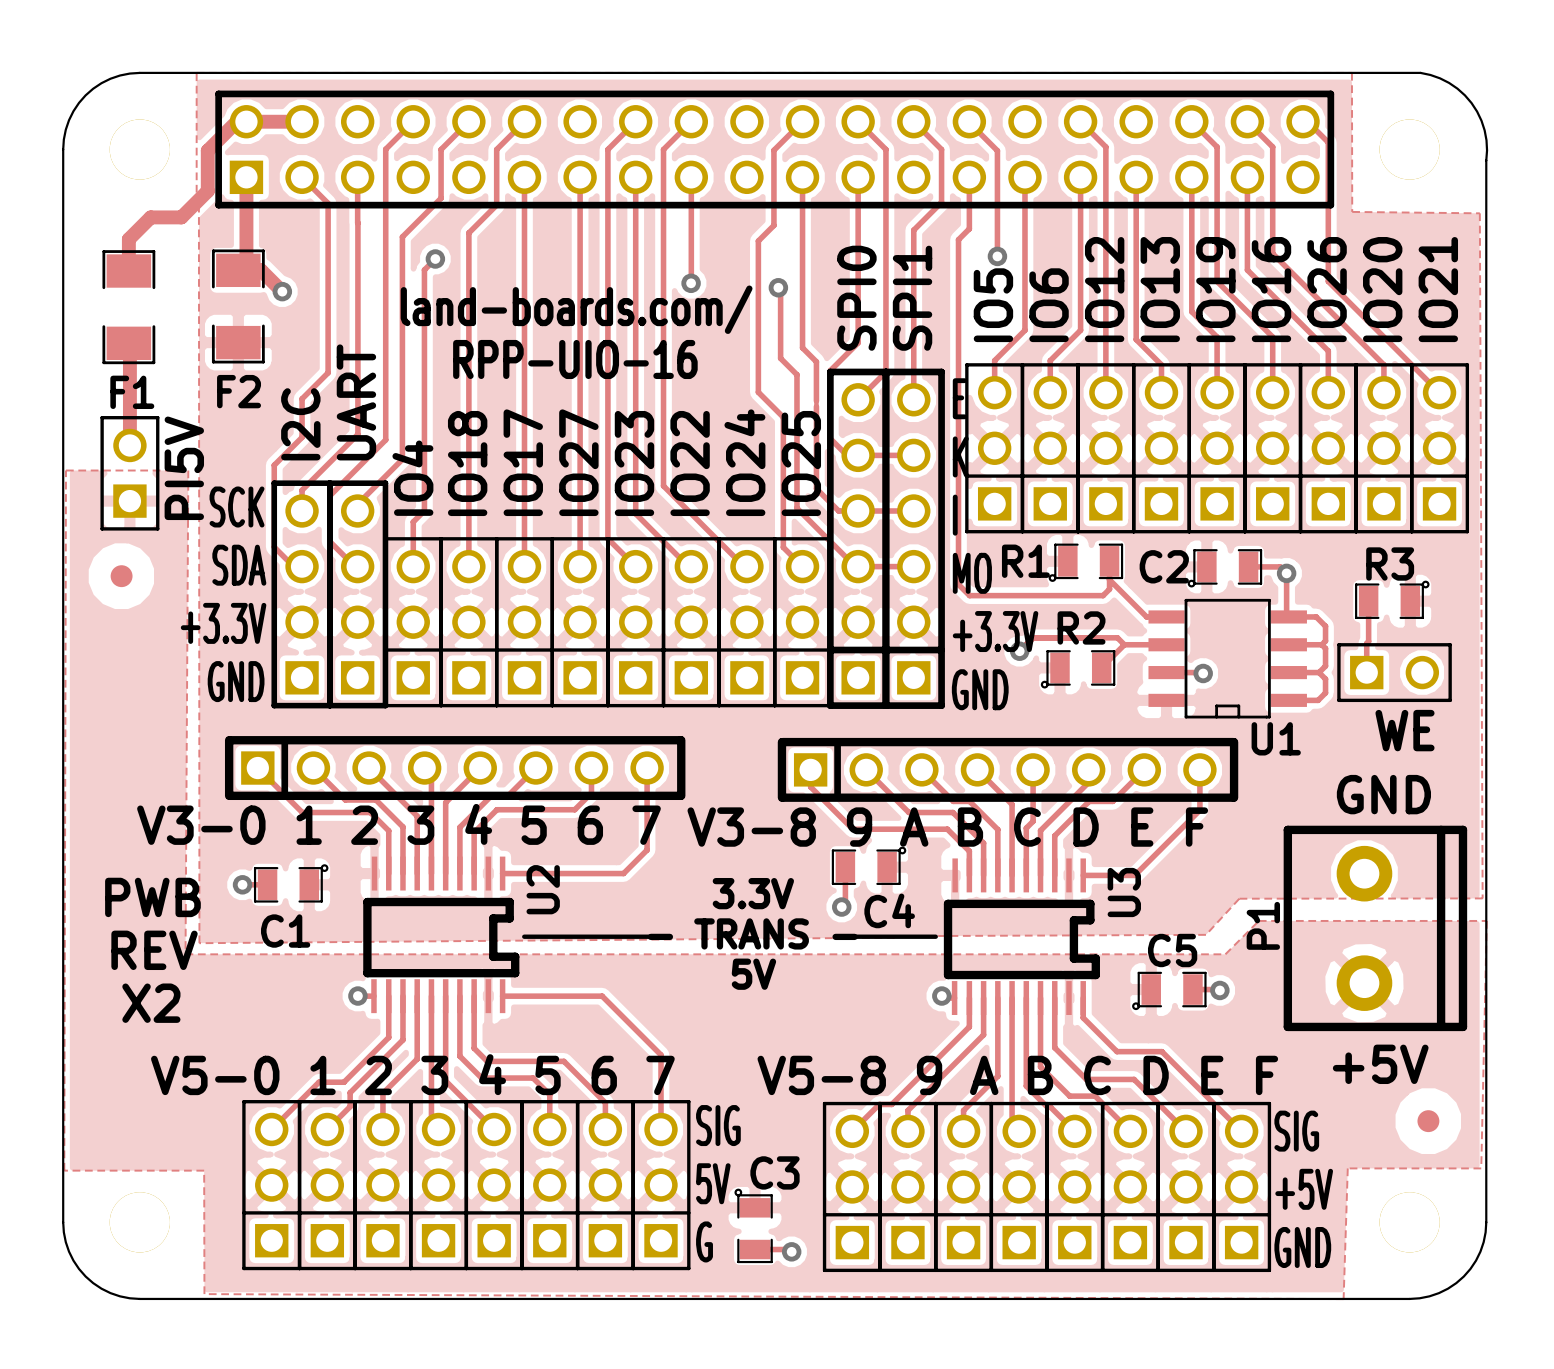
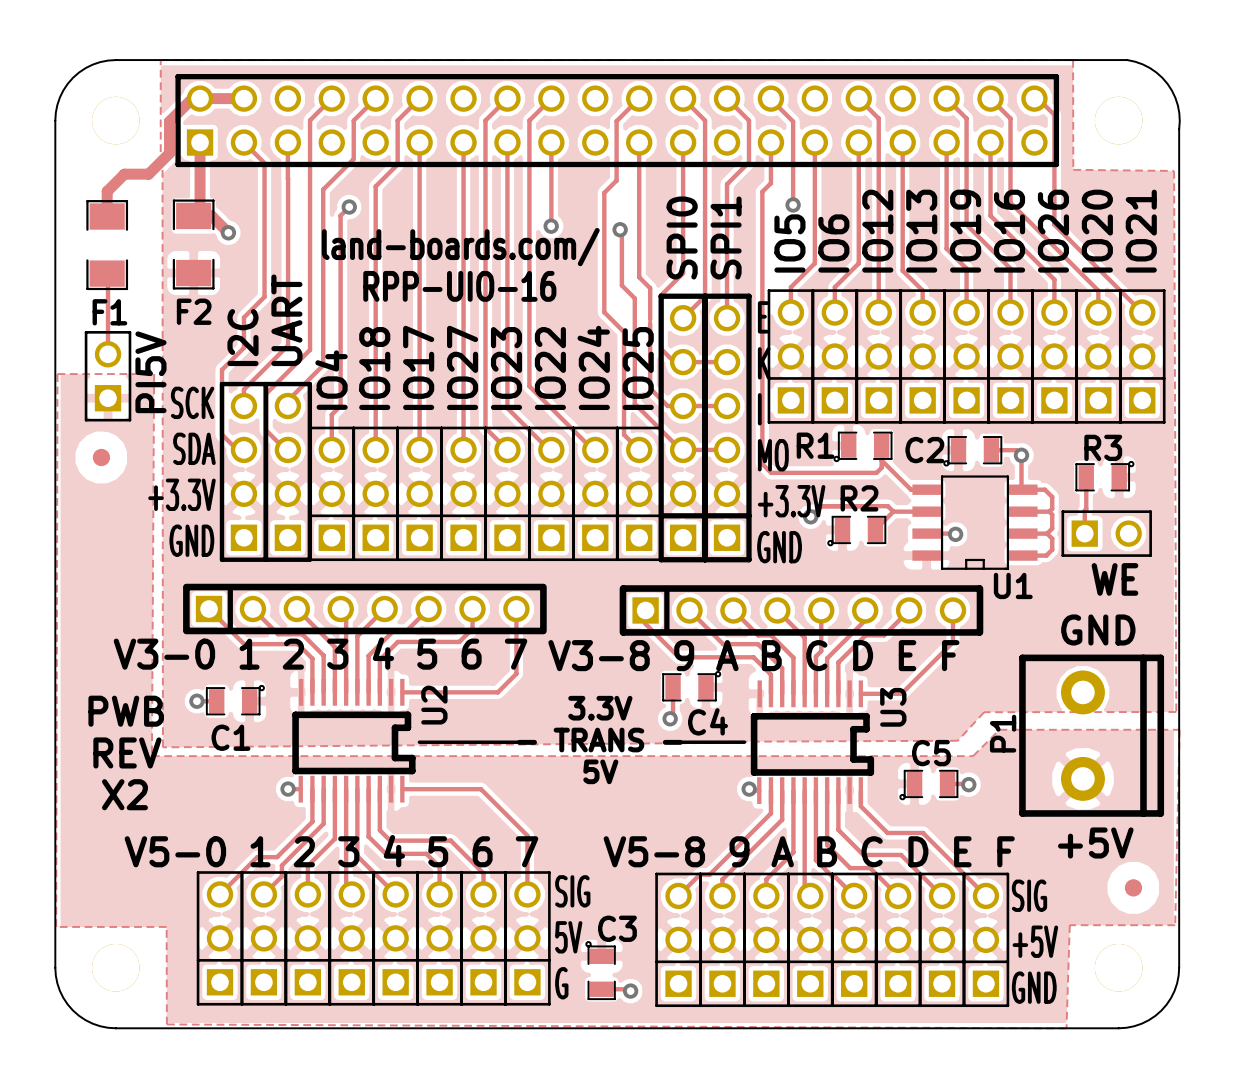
track width: thick (129, 344) (129, 445) -> thin (108, 274) (108, 354)

